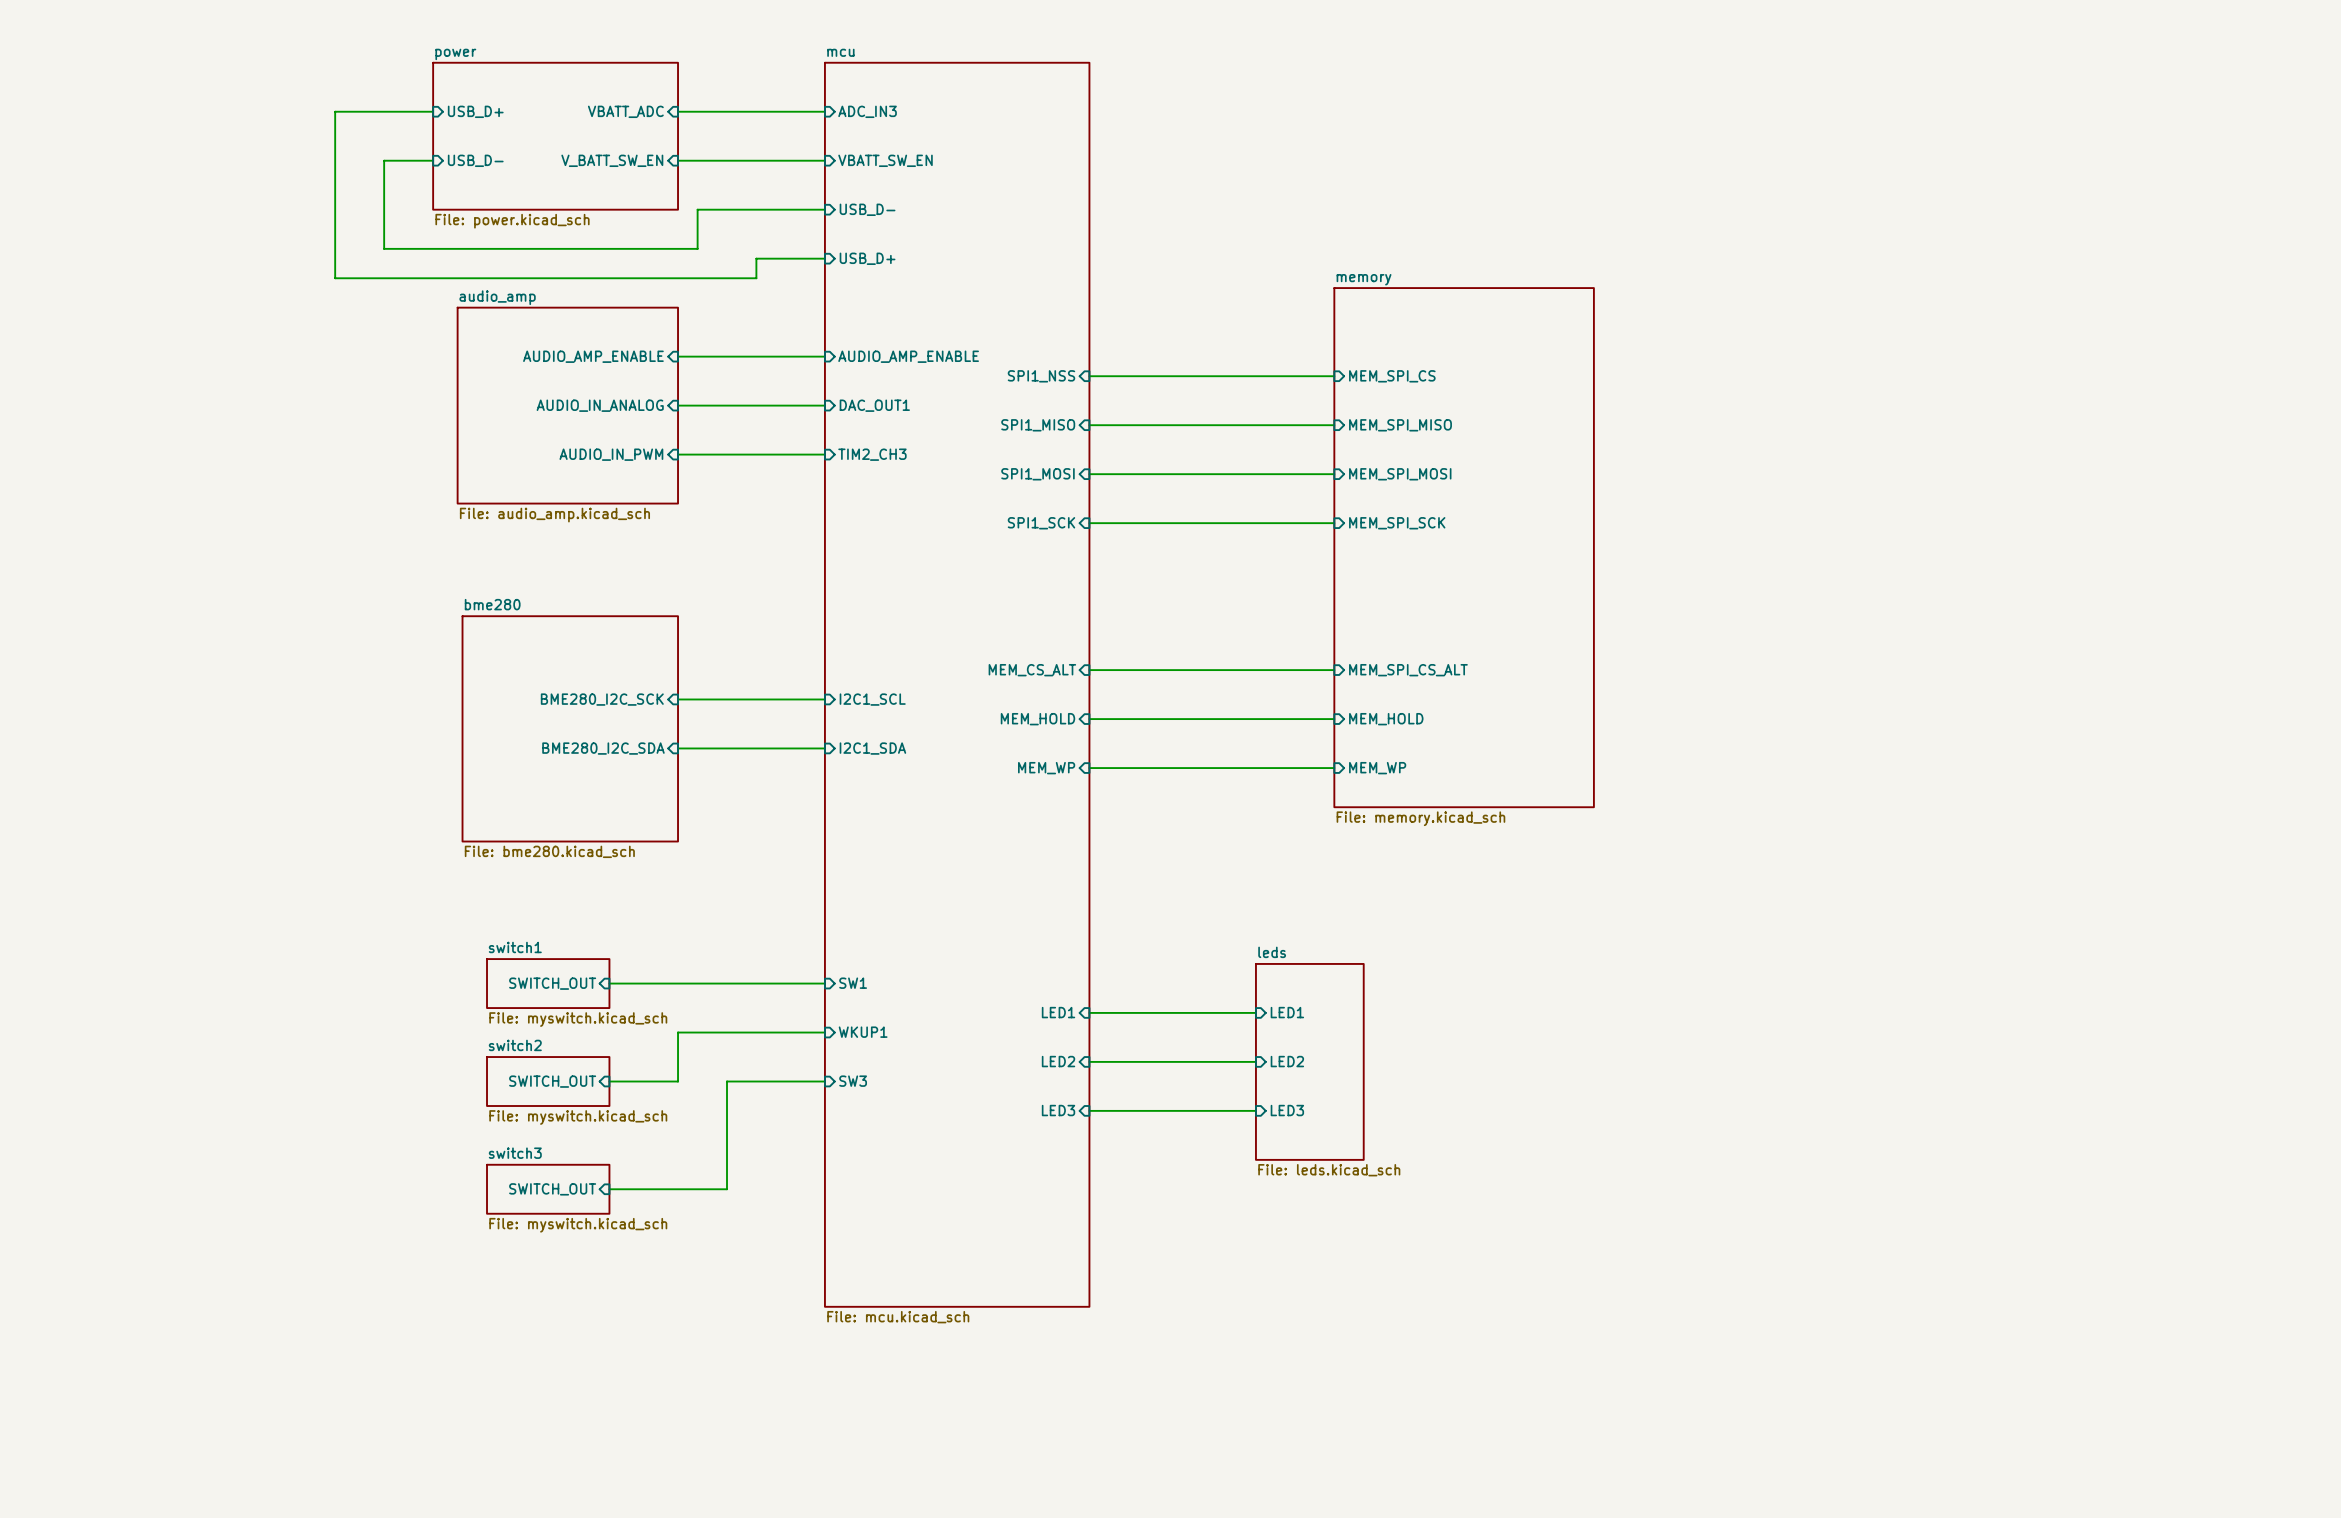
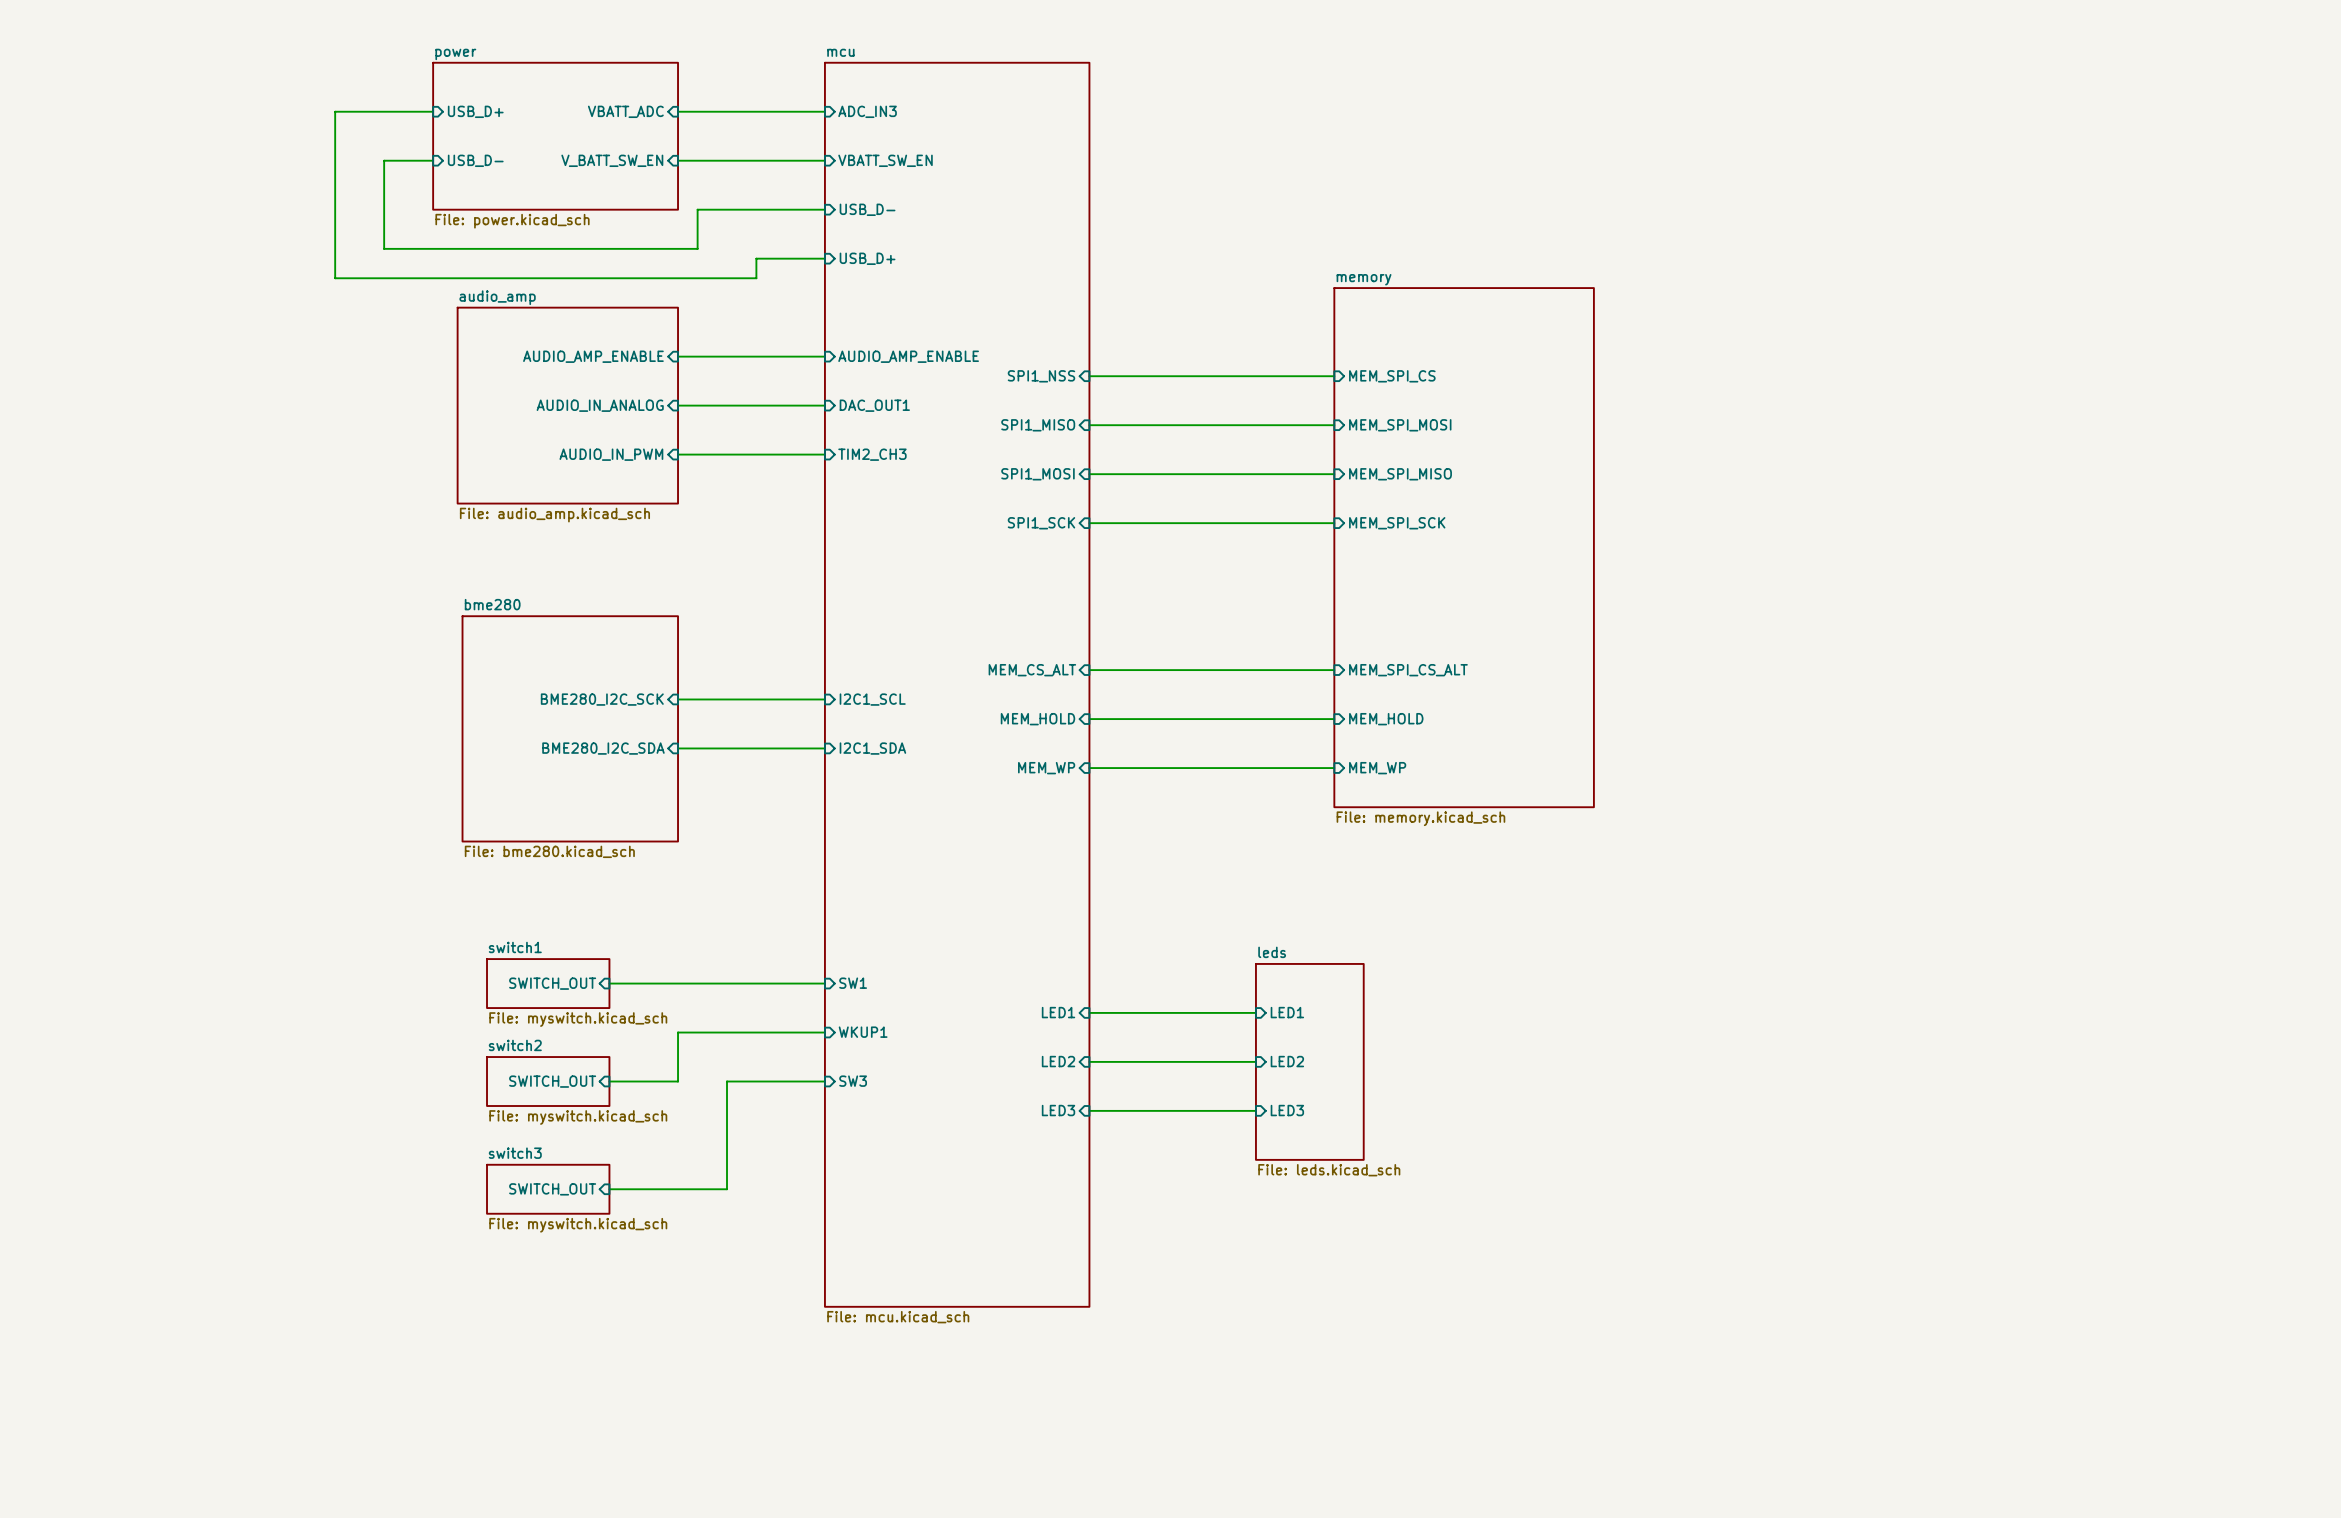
sheet pin: MEM_SPI_MISO (1400, 425) -> MEM_SPI_MOSI (1400, 425)
sheet pin: MEM_SPI_MOSI (1400, 474) -> MEM_SPI_MISO (1400, 474)

